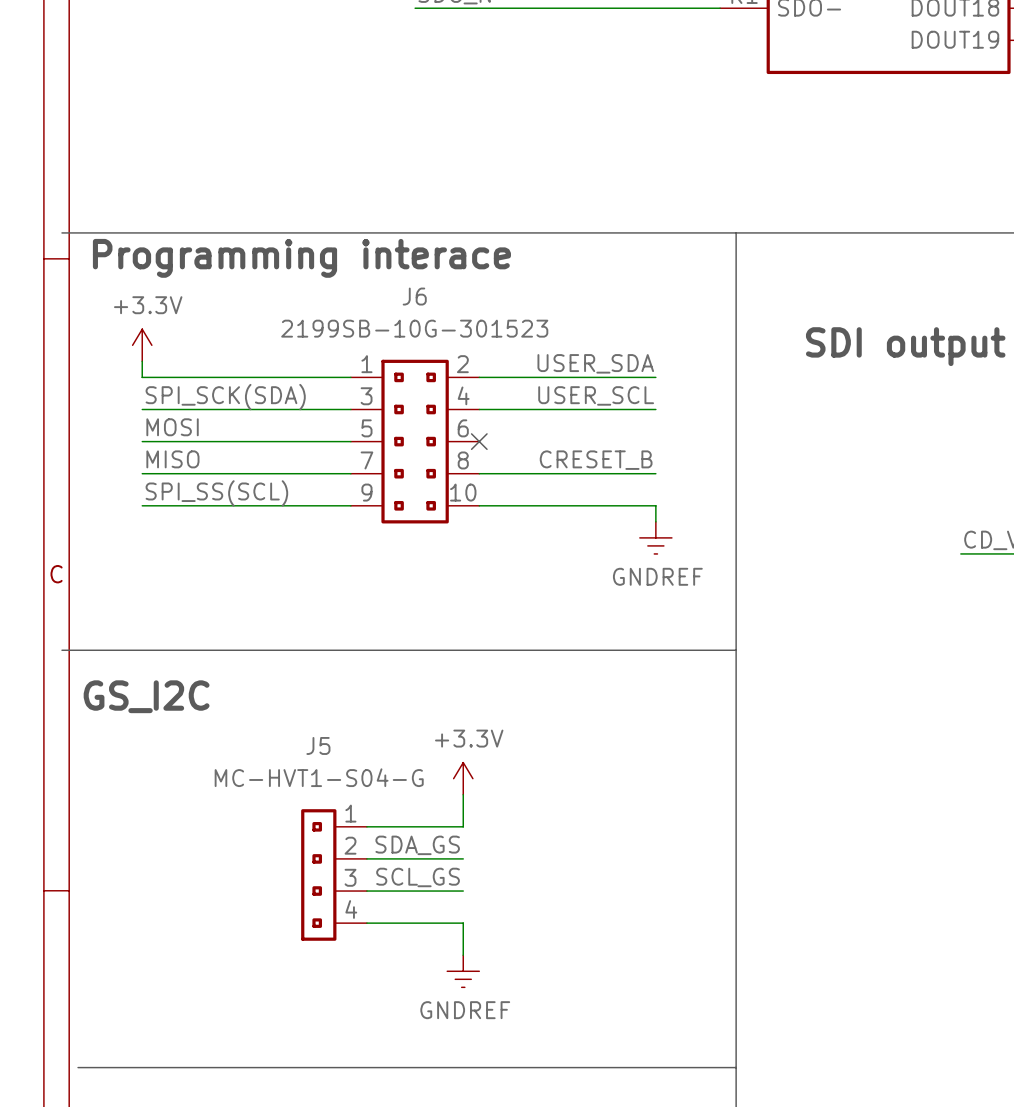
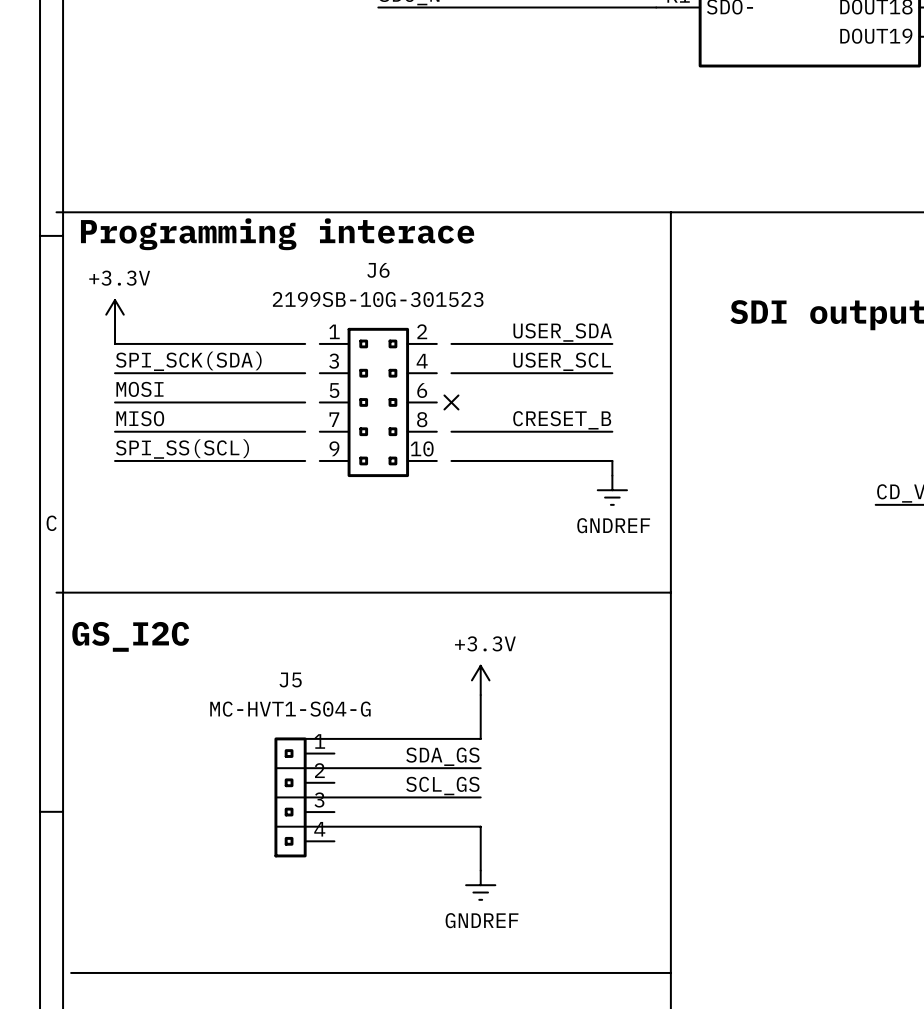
power symbol position: +3.3V (142, 345) -> +3.3V (115, 314)
wire: (142, 361) (142, 377) -> (115, 329) (115, 343) (129, 343)
label position: USER_SDA (595, 363) -> USER_SDA (562, 332)
wire: (334, 377) (350, 377) -> none
wire: (479, 377) (495, 377) -> (597, 343) (612, 343)
label position: USER_SCL (596, 395) -> USER_SCL (562, 361)
label position: SPI_SCK(SDA) (225, 397) -> SPI_SCK(SDA) (188, 361)
wire: (334, 409) (350, 409) -> (115, 373) (129, 373)
wire: (479, 409) (495, 409) -> (597, 373) (612, 373)
label position: MOSI (172, 427) -> MOSI (139, 389)
wire: (334, 441) (350, 441) -> (115, 402) (129, 402)
no-connect mark position: (479, 441) -> (451, 402)
label position: MISO (172, 459) -> MISO (140, 418)
label position: CRESET_B (596, 460) -> CRESET_B (562, 420)
wire: (334, 473) (350, 473) -> (115, 431) (129, 431)
wire: (479, 473) (495, 473) -> (597, 431) (612, 431)
label position: SPI_SS(SCL) (216, 493) -> SPI_SS(SCL) (182, 449)
wire: (334, 505) (350, 505) -> (115, 460) (129, 460)
wire: (479, 505) (495, 505) -> none
wire: (655, 505) (655, 521) -> (597, 460) (612, 460) (612, 475)
power symbol position: GNDREF (655, 537) -> GNDREF (612, 490)
wire: none -> (480, 695) (480, 738) (275, 738)
power symbol position: +3.3V (463, 778) -> +3.3V (480, 680)
wire: (463, 794) (463, 826) (366, 826) -> none
wire: none -> (275, 768) (480, 768)
label position: SDA_GS (417, 845) -> SDA_GS (442, 756)
wire: (366, 858) (463, 858) -> none
wire: none -> (275, 797) (480, 797)
label position: SCL_GS (418, 877) -> SCL_GS (442, 786)
wire: (366, 891) (463, 891) -> none
wire: none -> (275, 826) (480, 826) (480, 870)
wire: (366, 923) (463, 923) (463, 955) -> none
power symbol position: GNDREF (463, 971) -> GNDREF (480, 885)

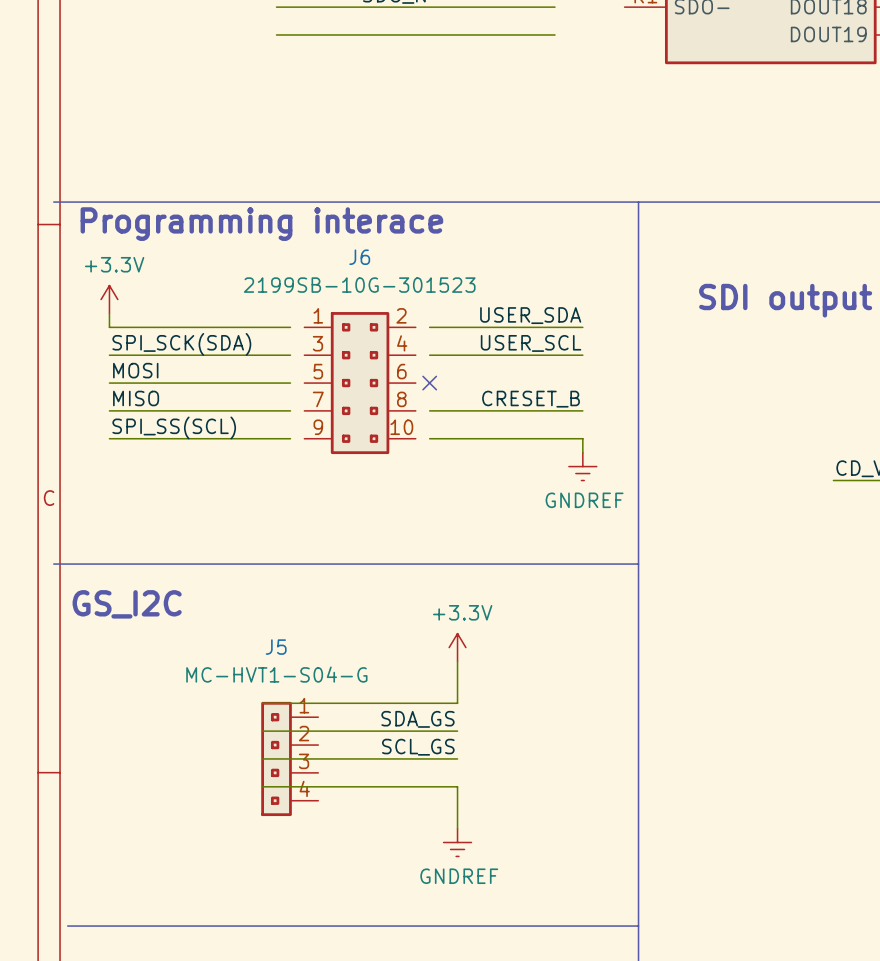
wire: none -> (276, 7) (360, 7)
wire: (583, 7) (656, 7) -> none
wire: none -> (276, 34) (554, 34)

